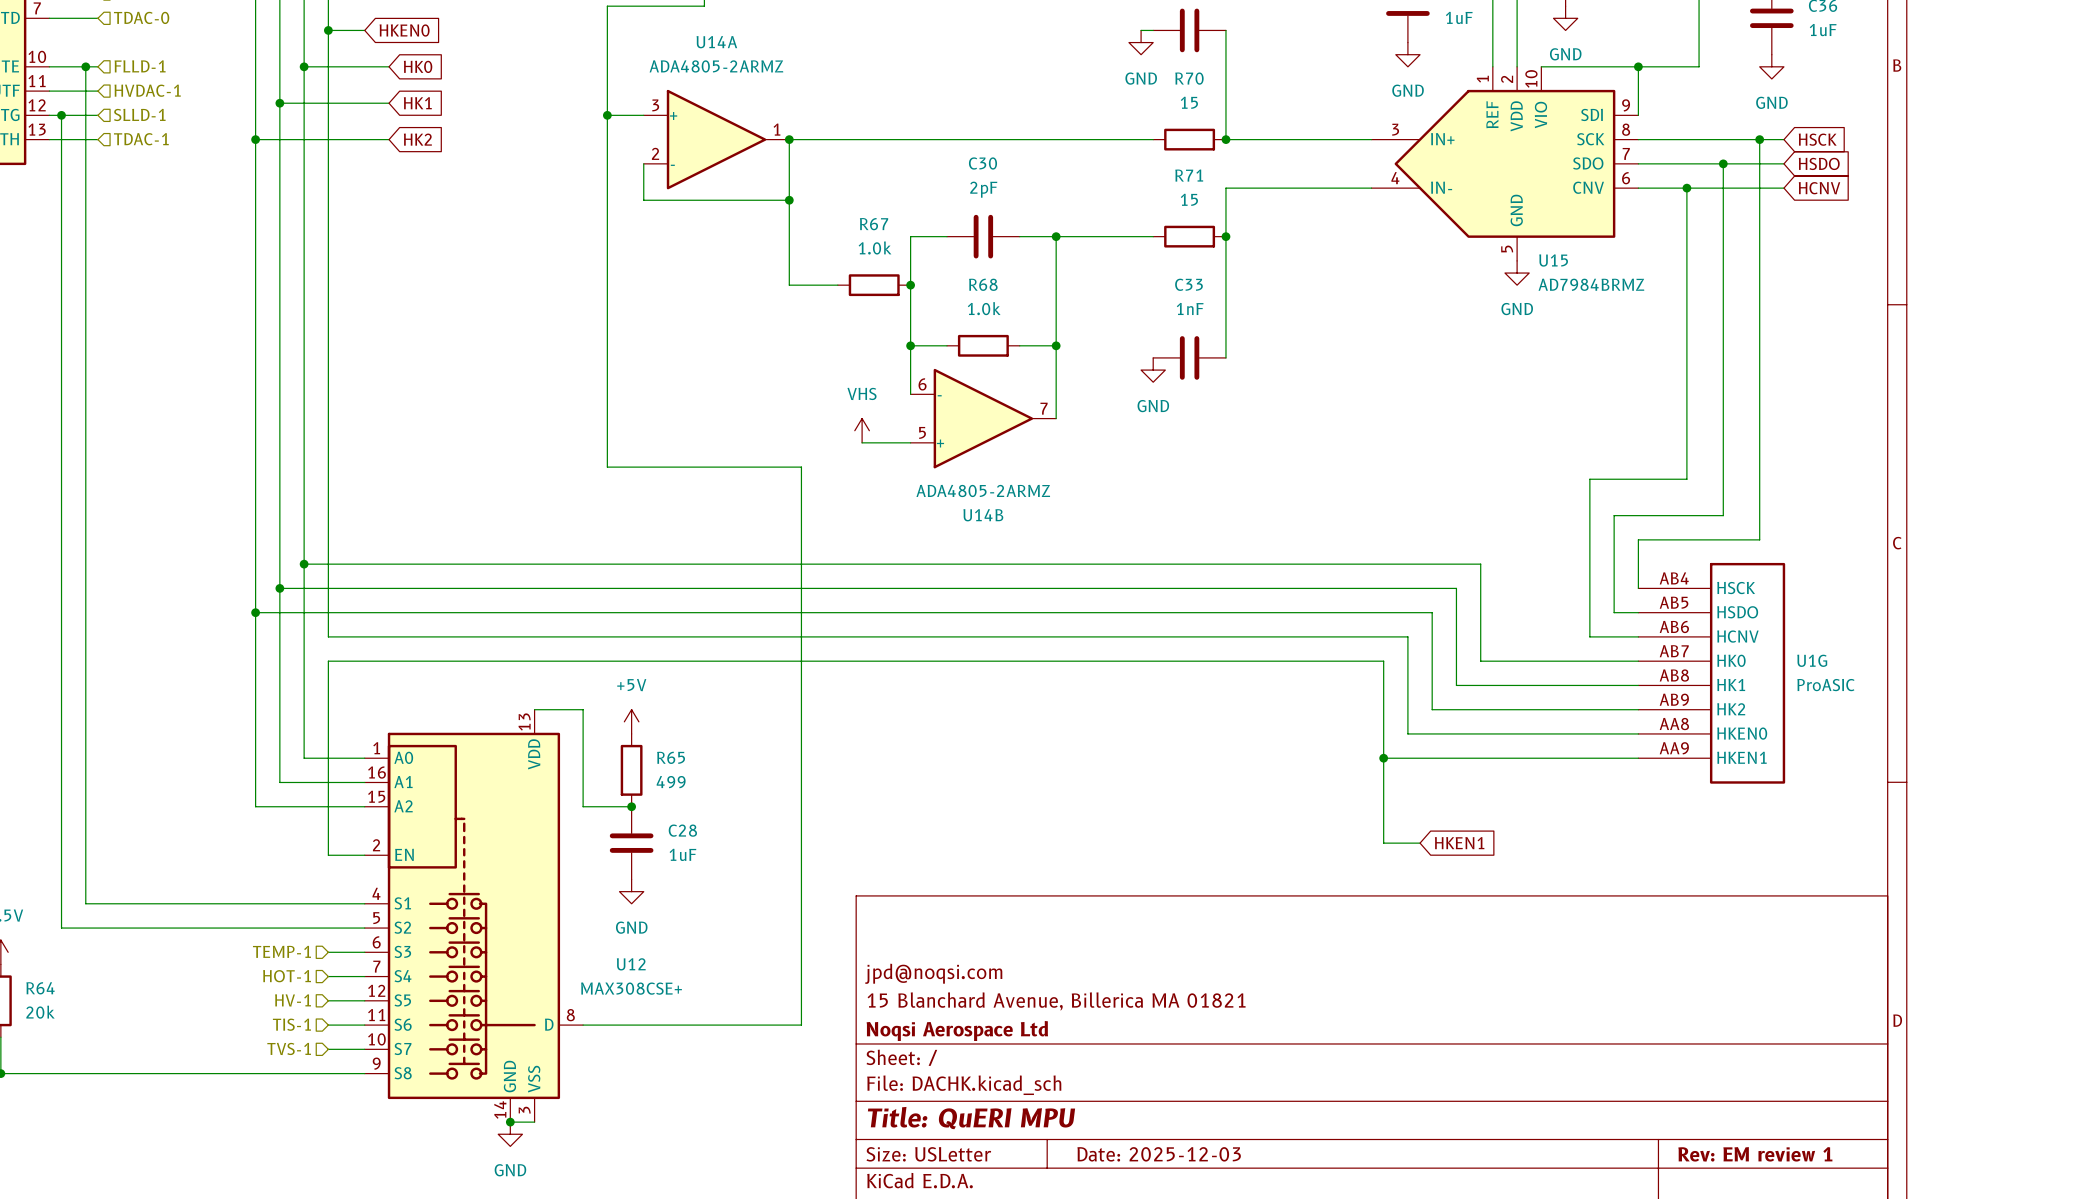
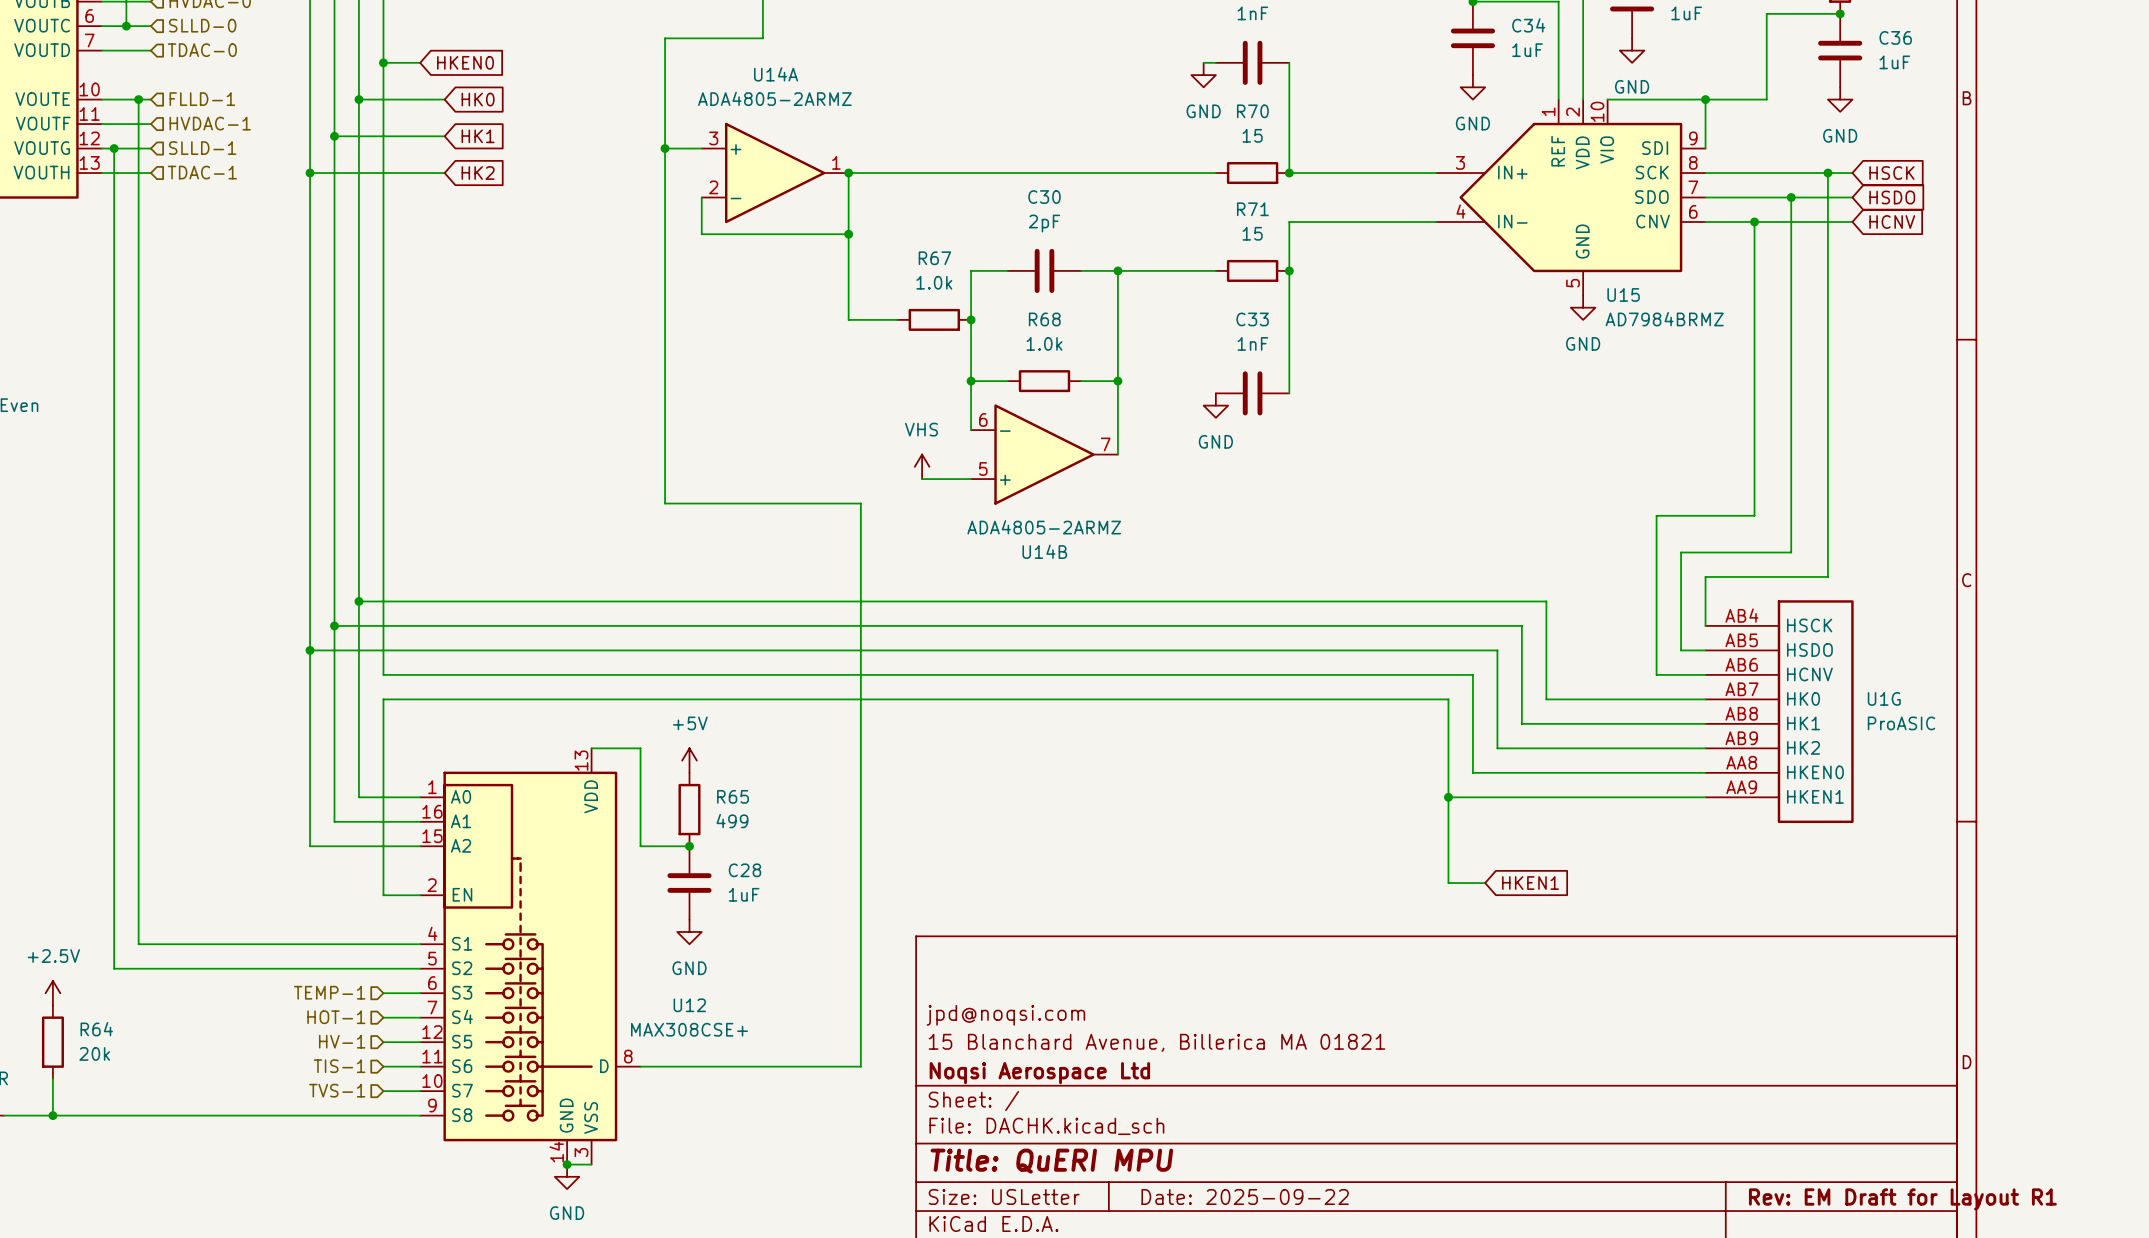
title block: Date: 2025-12-03 (1159, 1154) -> Date: 2025-09-22 (1245, 1197)
title block: Rev: EM review 1 (1755, 1154) -> Rev: EM Draft for Layout R1 (1902, 1199)

